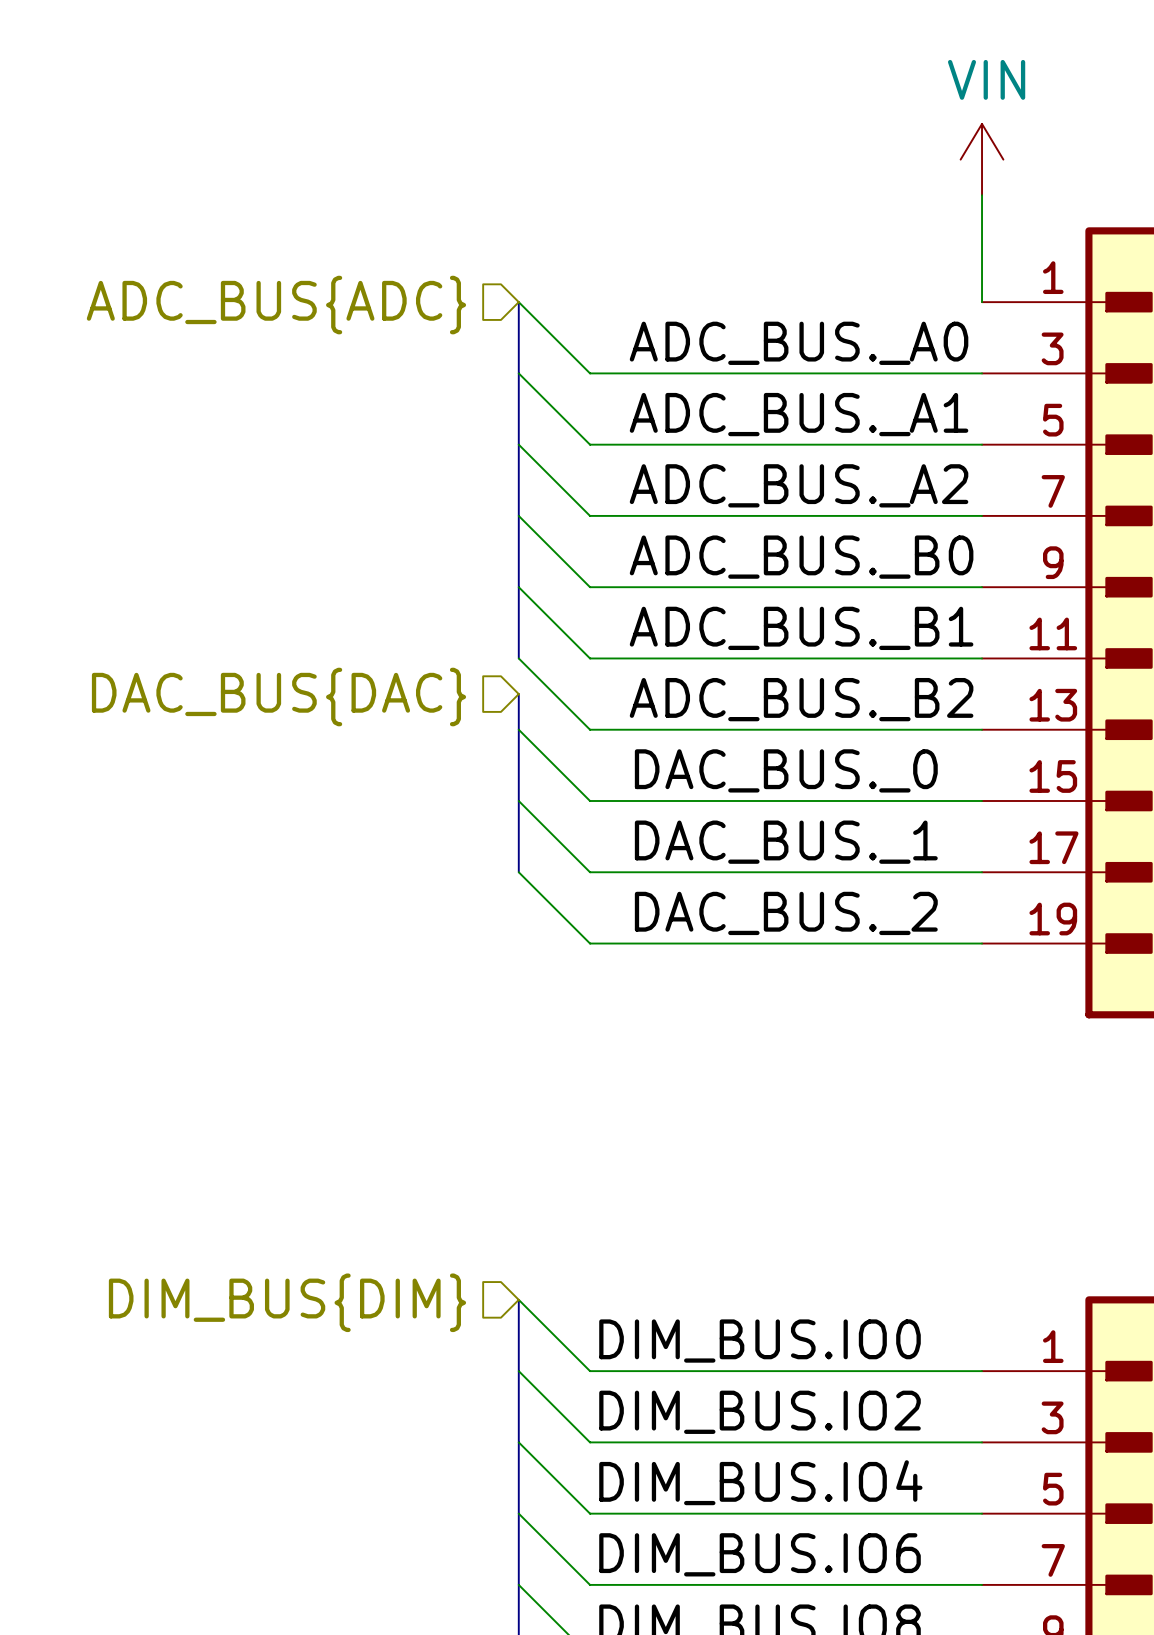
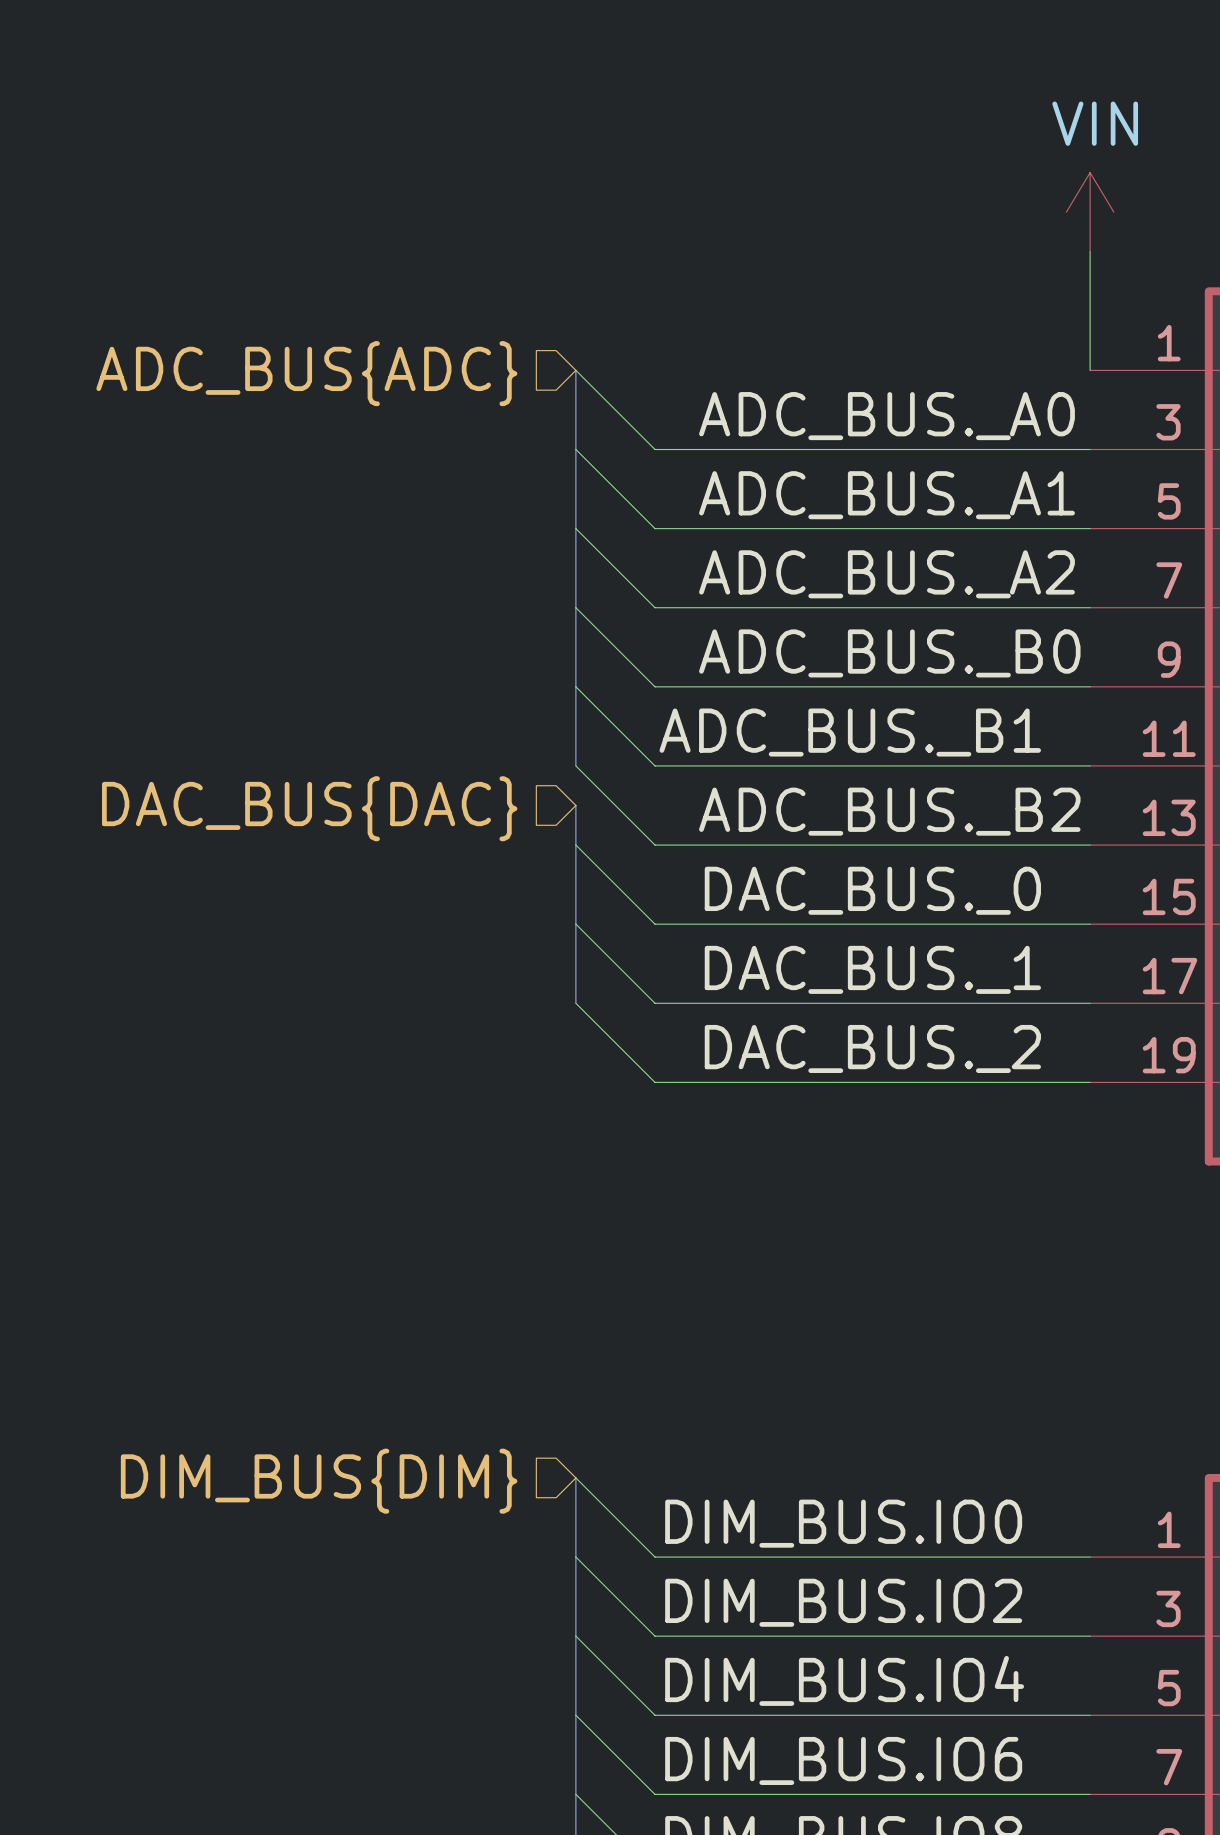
label position: ADC_BUS._B1 (801, 628) -> ADC_BUS._B1 (850, 732)

